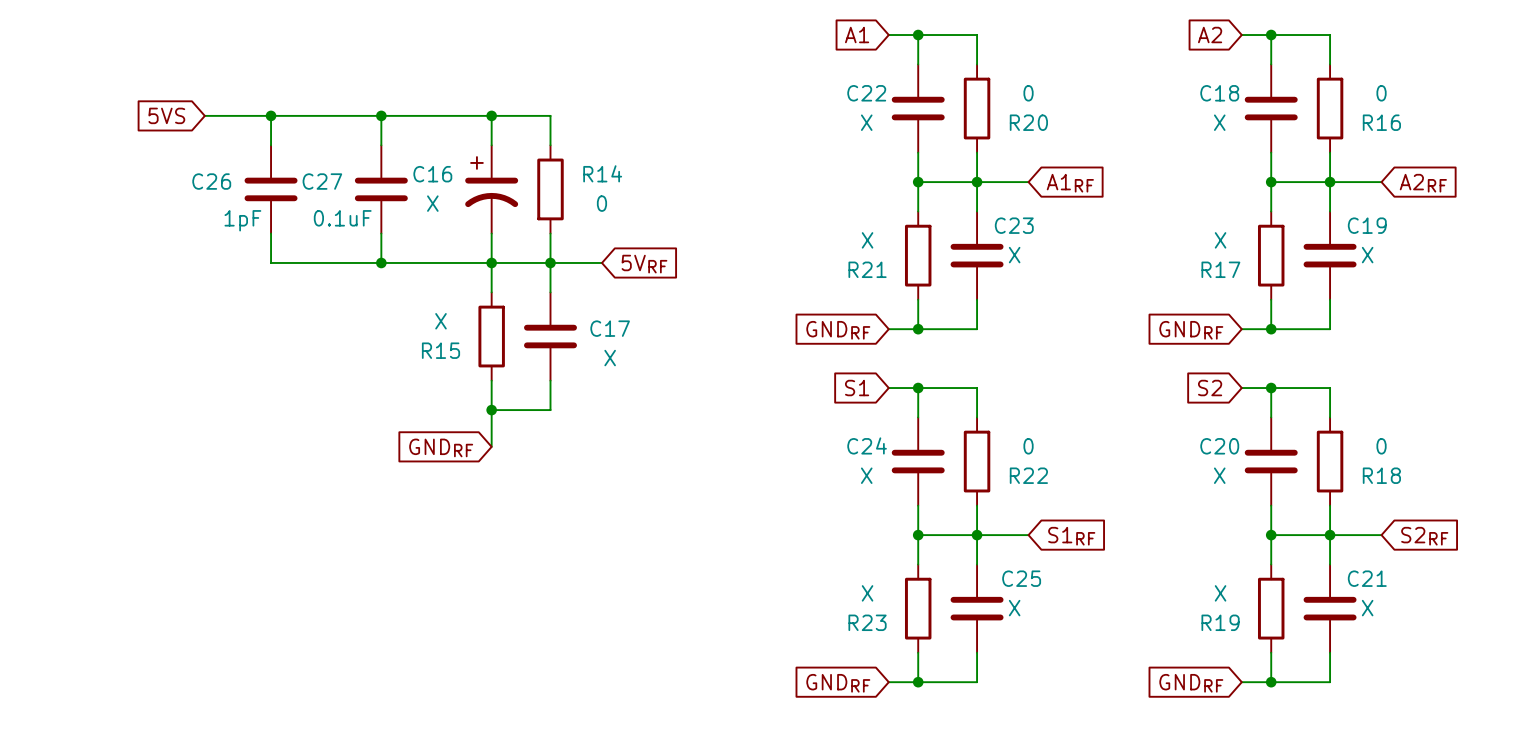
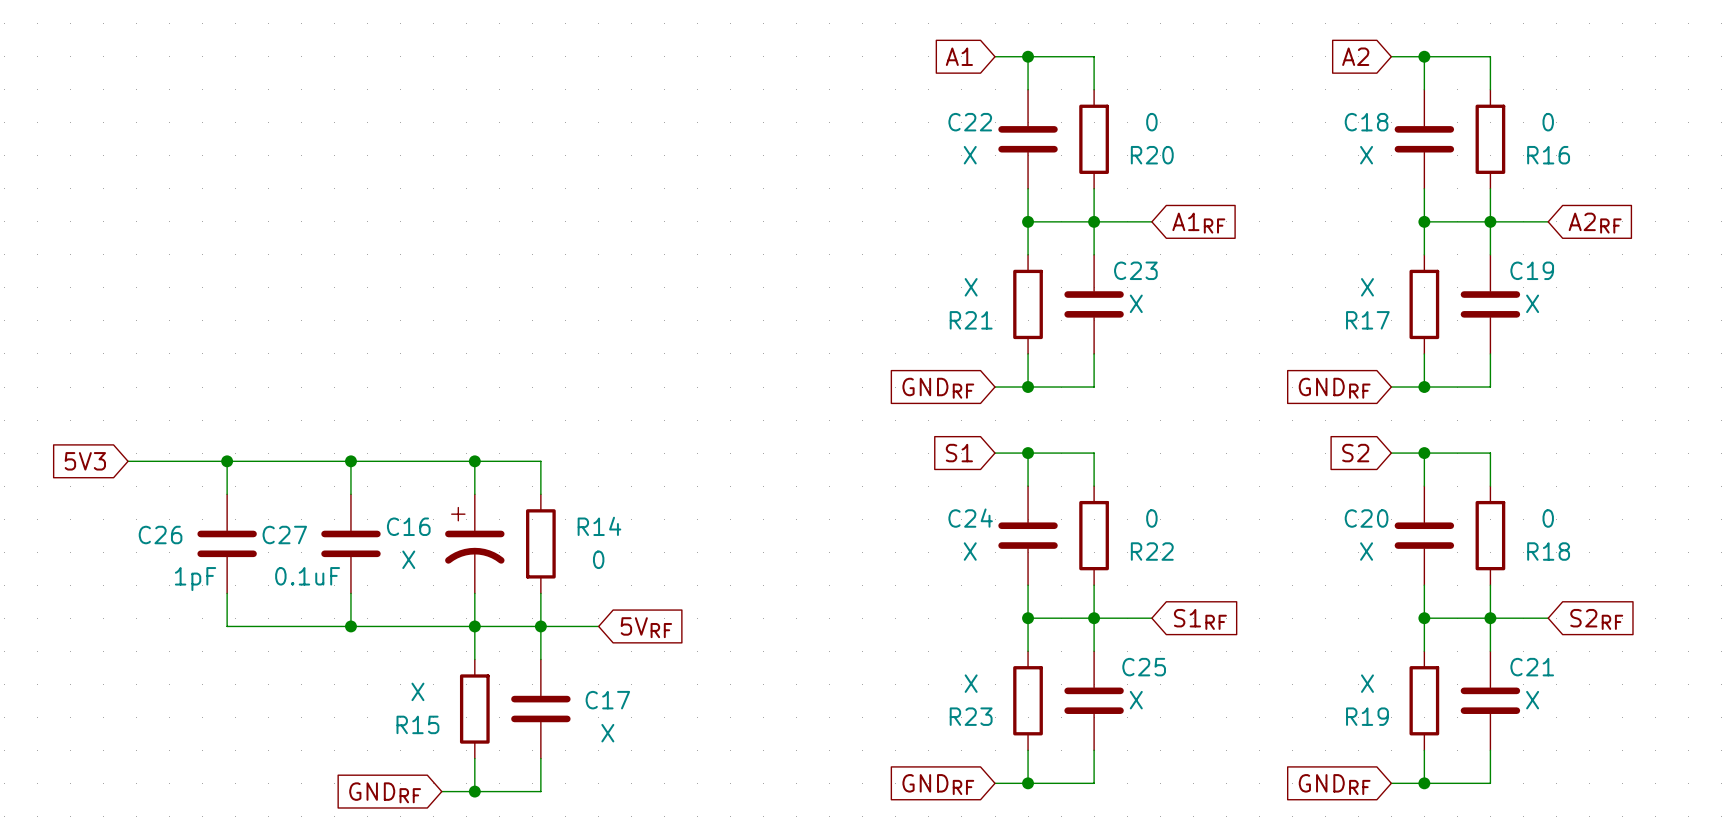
global label: 5VS (166, 115) -> none
wire: (204, 115) (550, 115) (550, 145) -> none
wire: (271, 115) (271, 145) -> (227, 461) (227, 494)
junction: (271, 115) -> none
wire: (381, 115) (381, 145) -> (350, 461) (350, 494)
junction: (381, 115) -> none
wire: (491, 115) (491, 145) -> (474, 461) (474, 494)
junction: (491, 115) -> none
C26 position: (271, 189) -> (227, 543)
C27 position: (381, 189) -> (350, 543)
C16 position: (491, 189) -> (474, 543)
R14 position: (550, 189) -> (540, 543)
wire: (271, 233) (271, 262) (601, 262) -> (227, 593) (227, 626) (598, 626)
wire: (381, 233) (381, 262) -> (350, 593) (350, 626)
wire: (491, 233) (491, 292) -> (474, 593) (474, 659)
wire: (550, 233) (550, 292) -> (540, 593) (540, 659)
junction: (381, 262) -> none
junction: (491, 262) -> none
junction: (550, 262) -> none
global label position: 5VRF (644, 264) -> 5VRF (646, 627)
R15 position: (491, 336) -> (474, 709)
C17 position: (550, 336) -> (540, 709)
wire: (491, 380) (491, 446) -> none
wire: (550, 380) (550, 410) (491, 410) -> none
global label: none -> 5V3 (85, 461)
wire: none -> (128, 461) (540, 461) (540, 494)
junction: none -> (227, 461)
junction: none -> (350, 461)
junction: none -> (474, 461)
junction: (491, 410) -> none
global label position: GNDRF (441, 447) -> GNDRF (385, 792)
junction: none -> (350, 626)
junction: none -> (474, 626)
junction: none -> (540, 626)
wire: none -> (474, 758) (474, 791)
wire: none -> (540, 758) (540, 791) (441, 791)
junction: none -> (474, 791)

